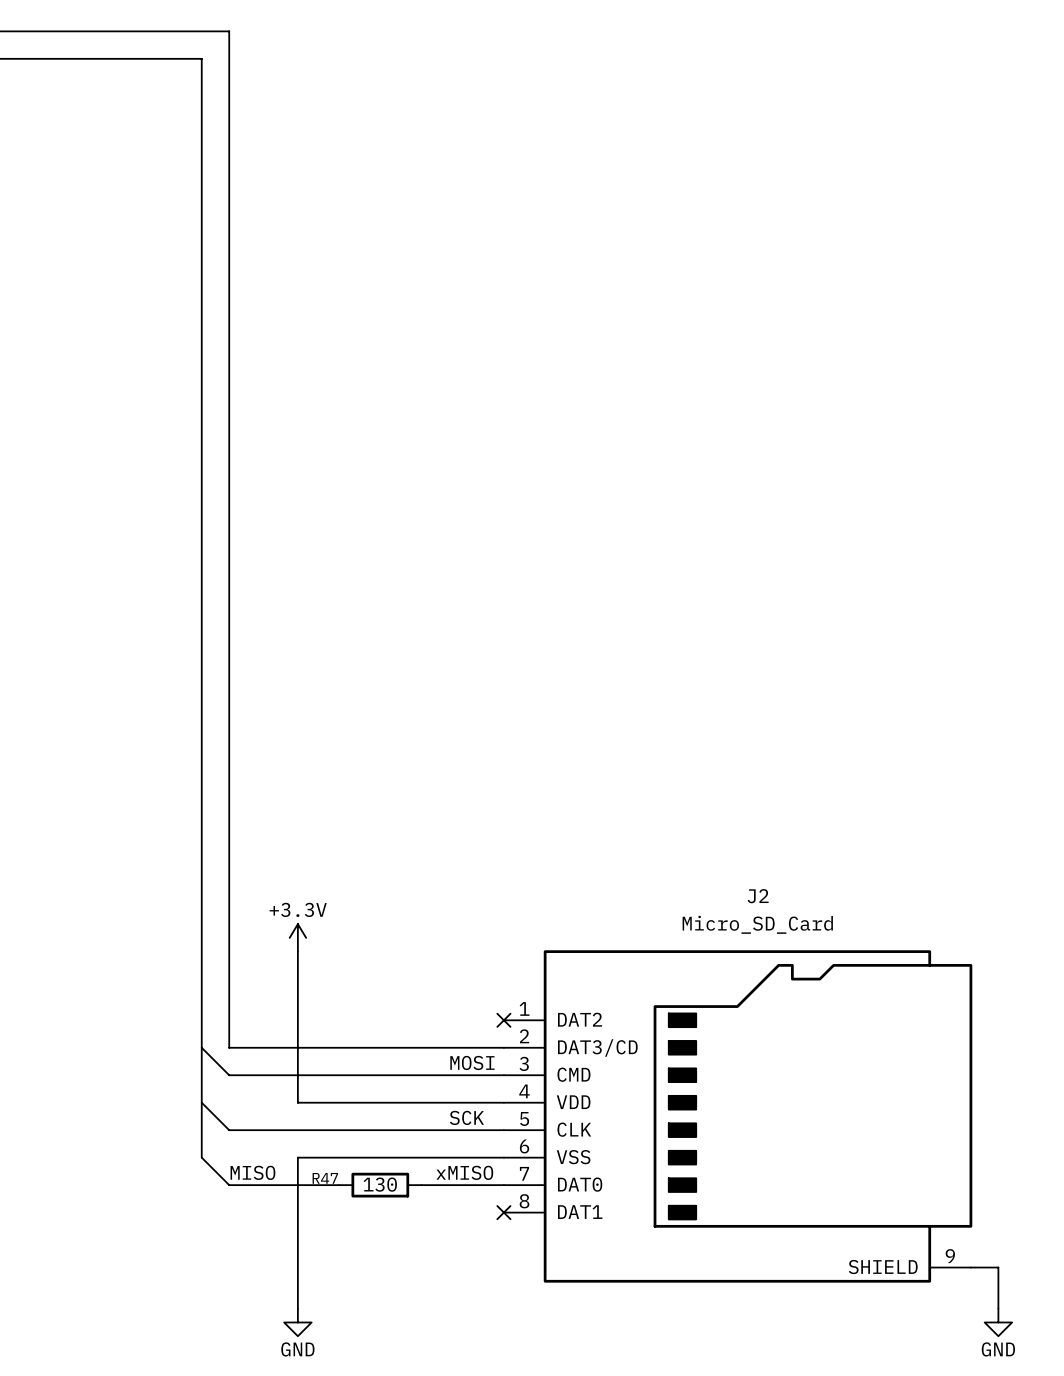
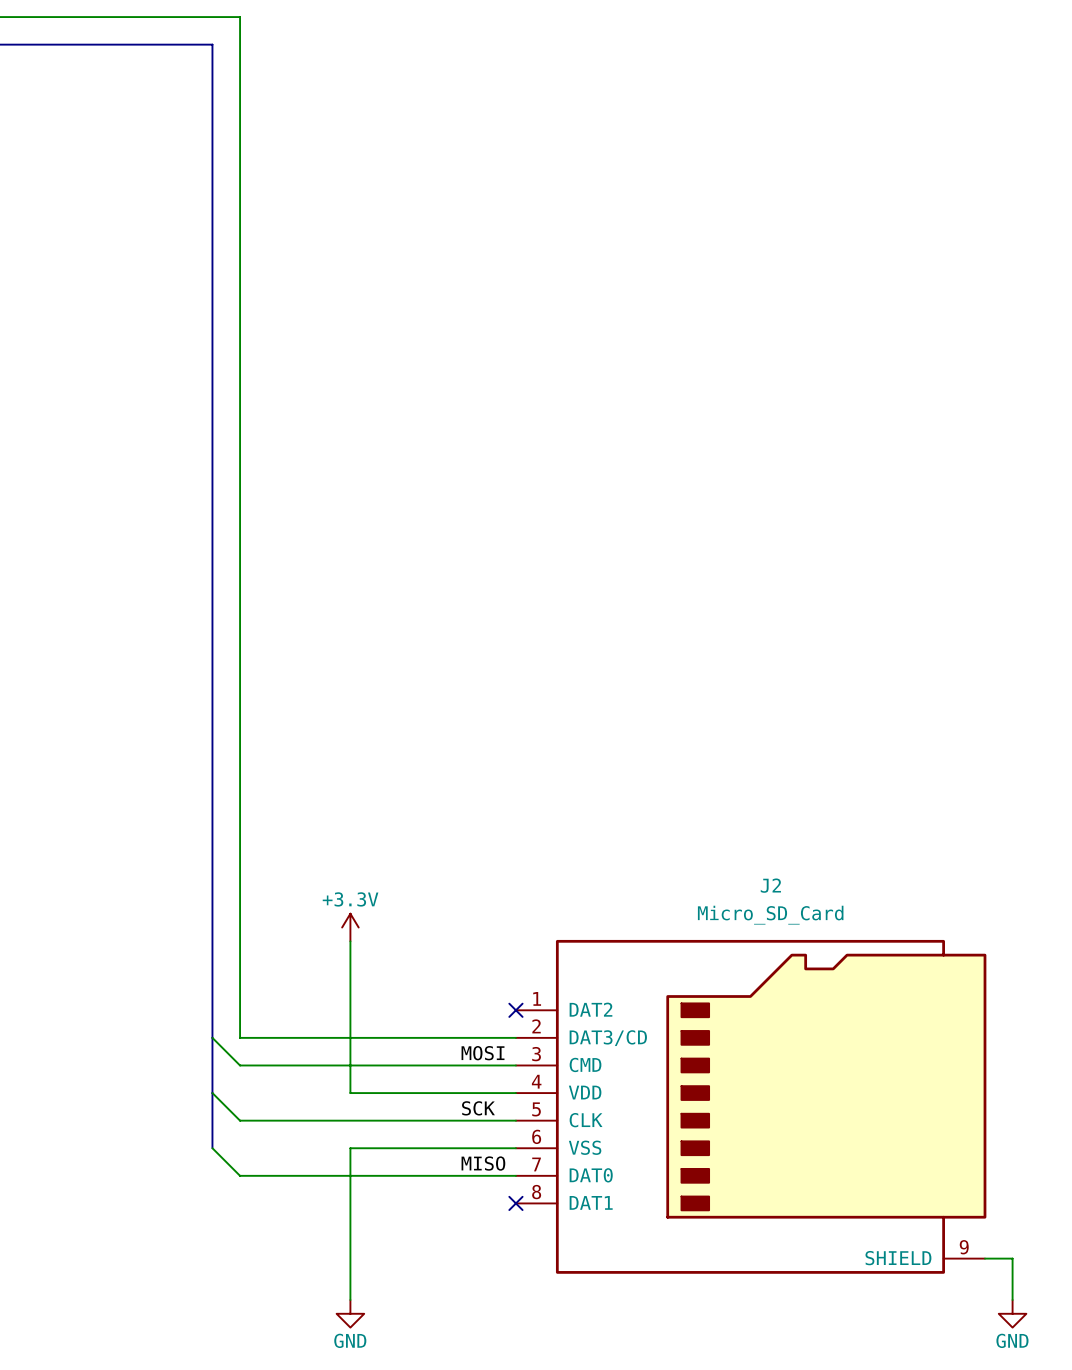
power symbol position: +3.3V (297, 937) -> +3.3V (350, 927)
wire: (297, 951) (297, 1102) (339, 1102) -> (350, 941) (350, 1093)
wire: (339, 1157) (297, 1157) (297, 1308) -> (350, 1148) (350, 1299)
label position: MISO (252, 1172) -> MISO (483, 1163)
label: xMISO (464, 1172) -> none
wire: none -> (350, 1175) (433, 1175)
R47: 130 (380, 1185) -> none
power symbol position: GND (297, 1322) -> GND (350, 1313)

